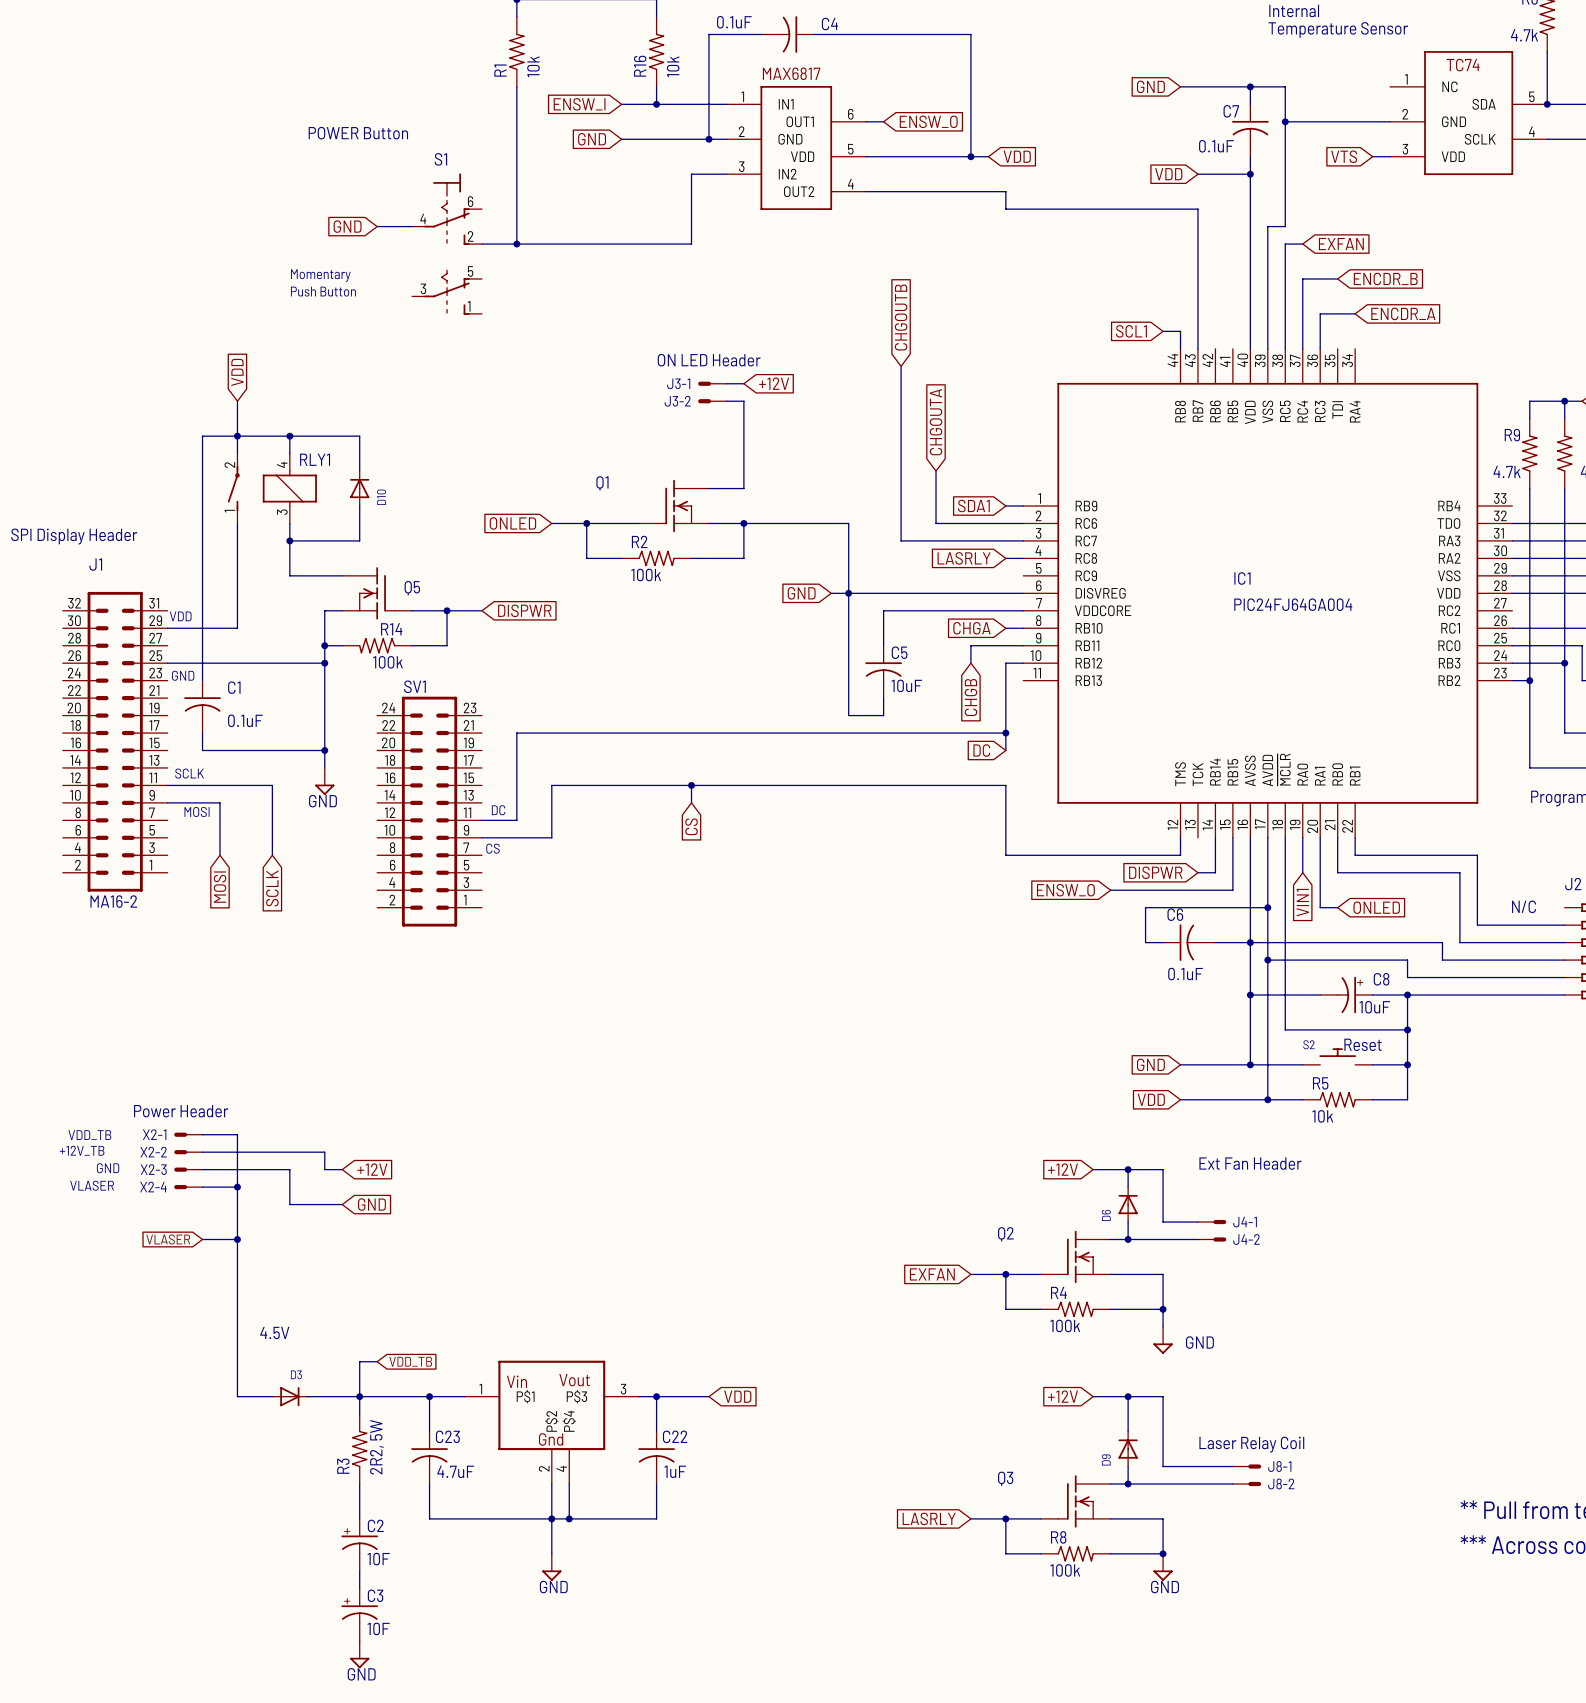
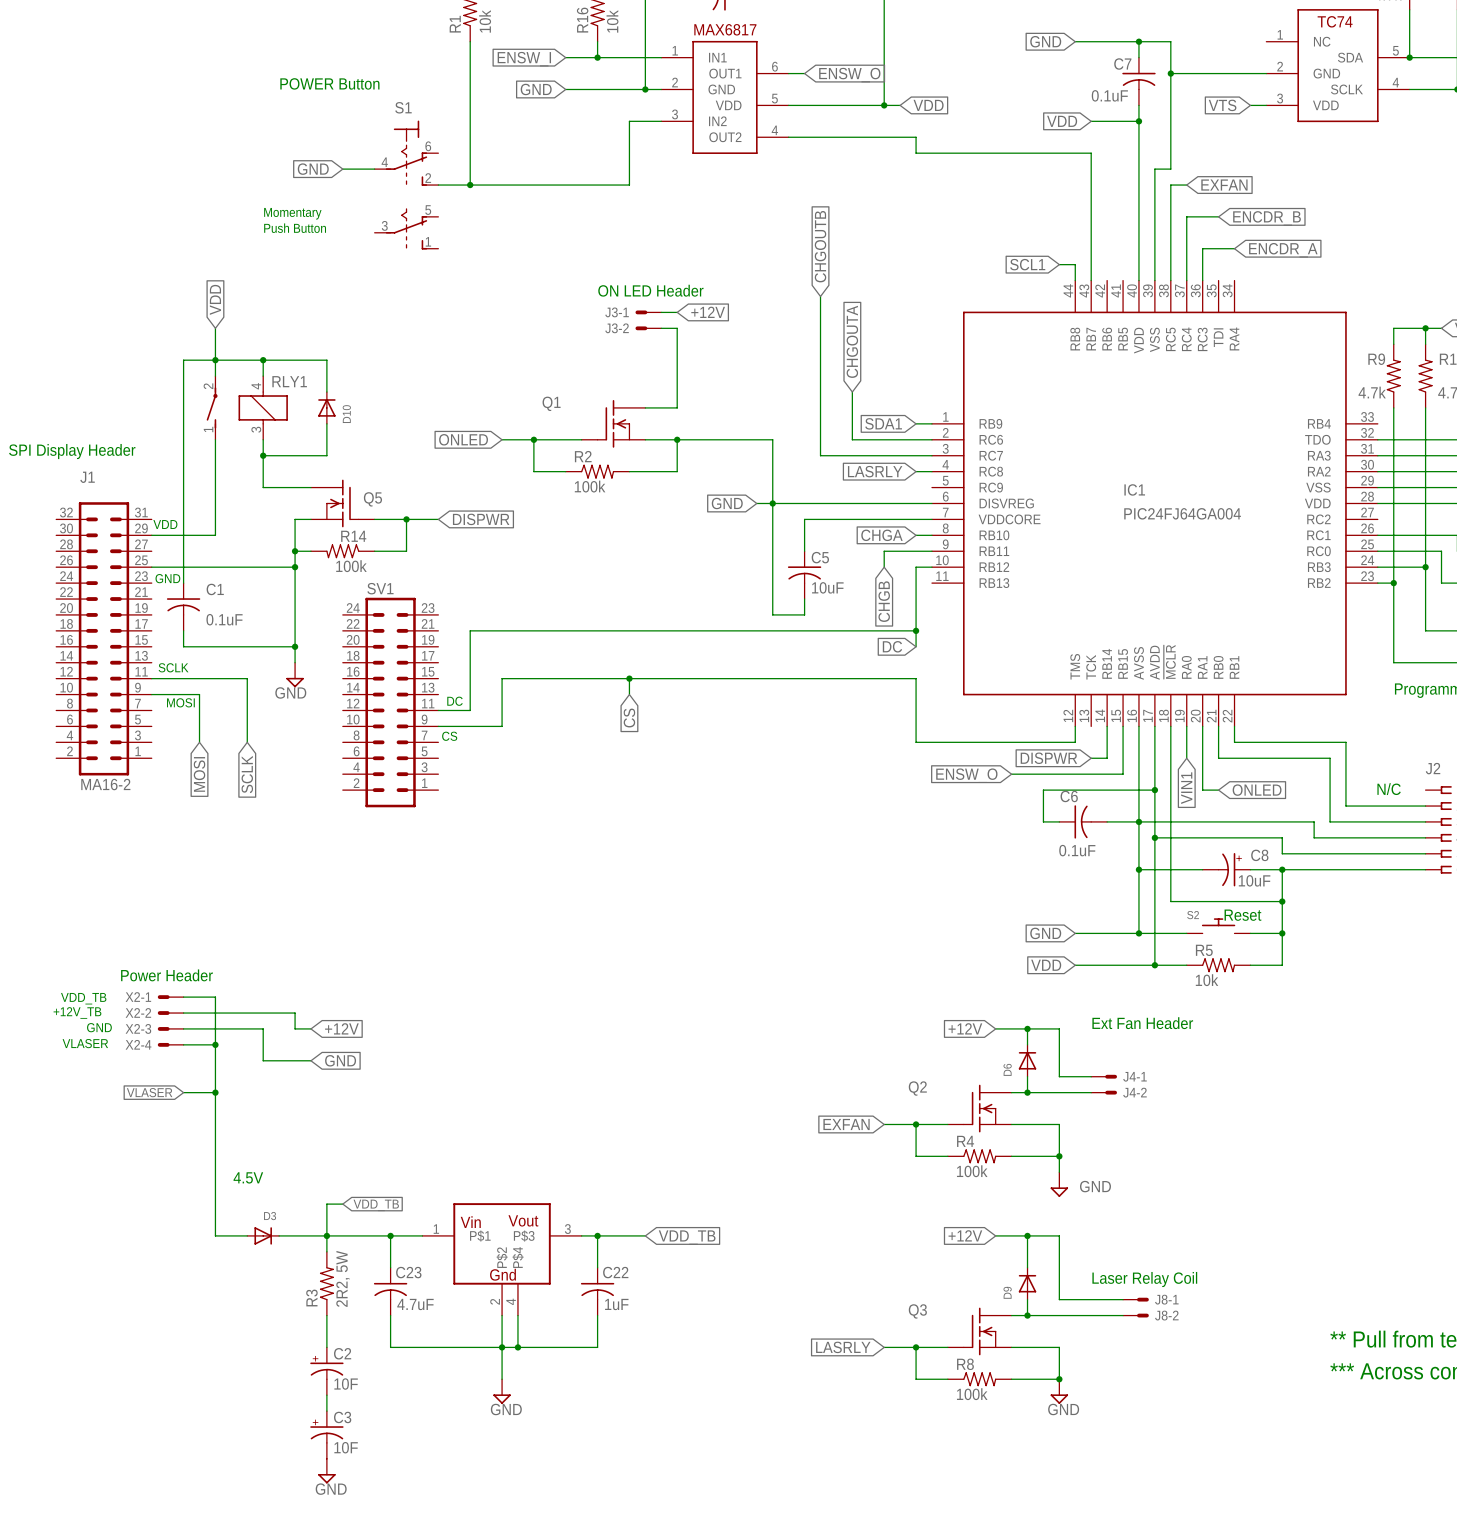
global label: VDD (737, 1396) -> VDD_TB (687, 1237)

